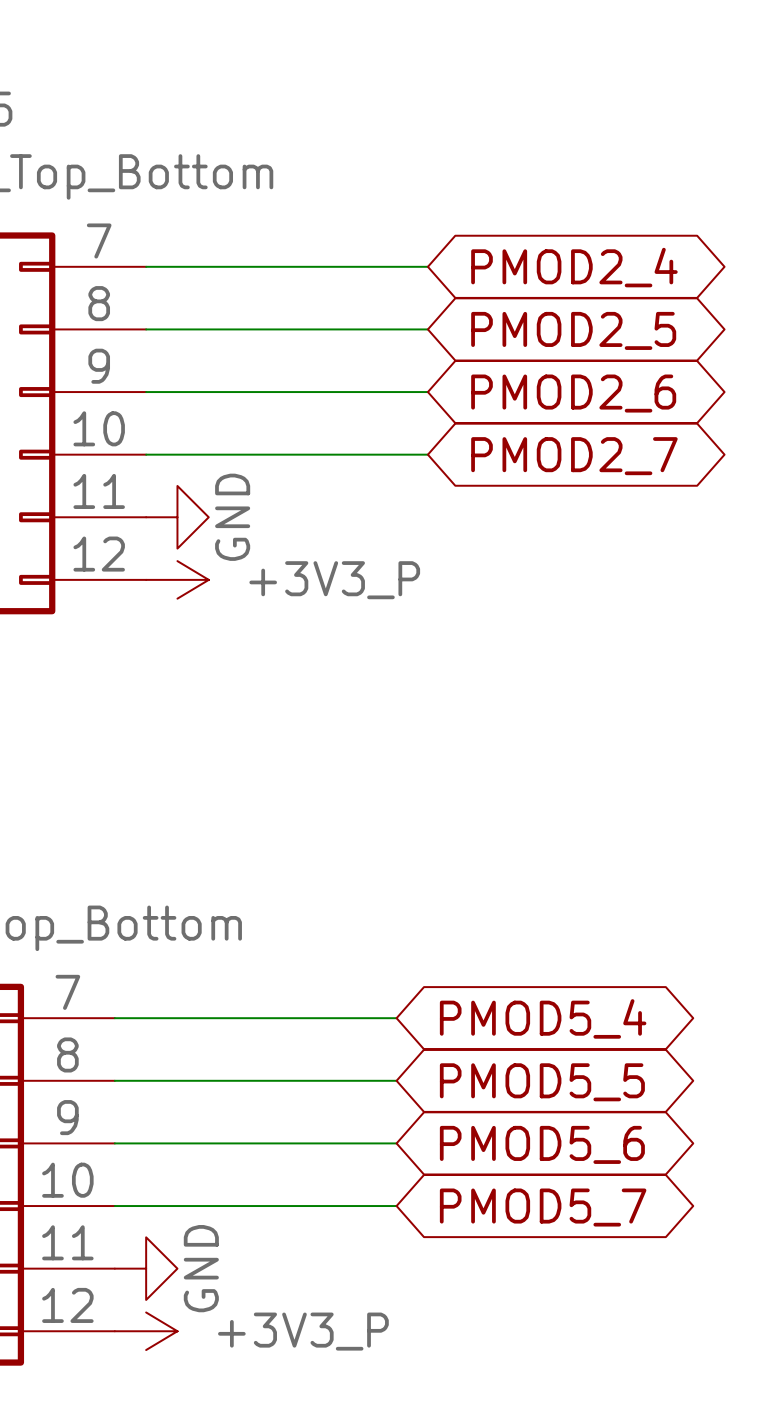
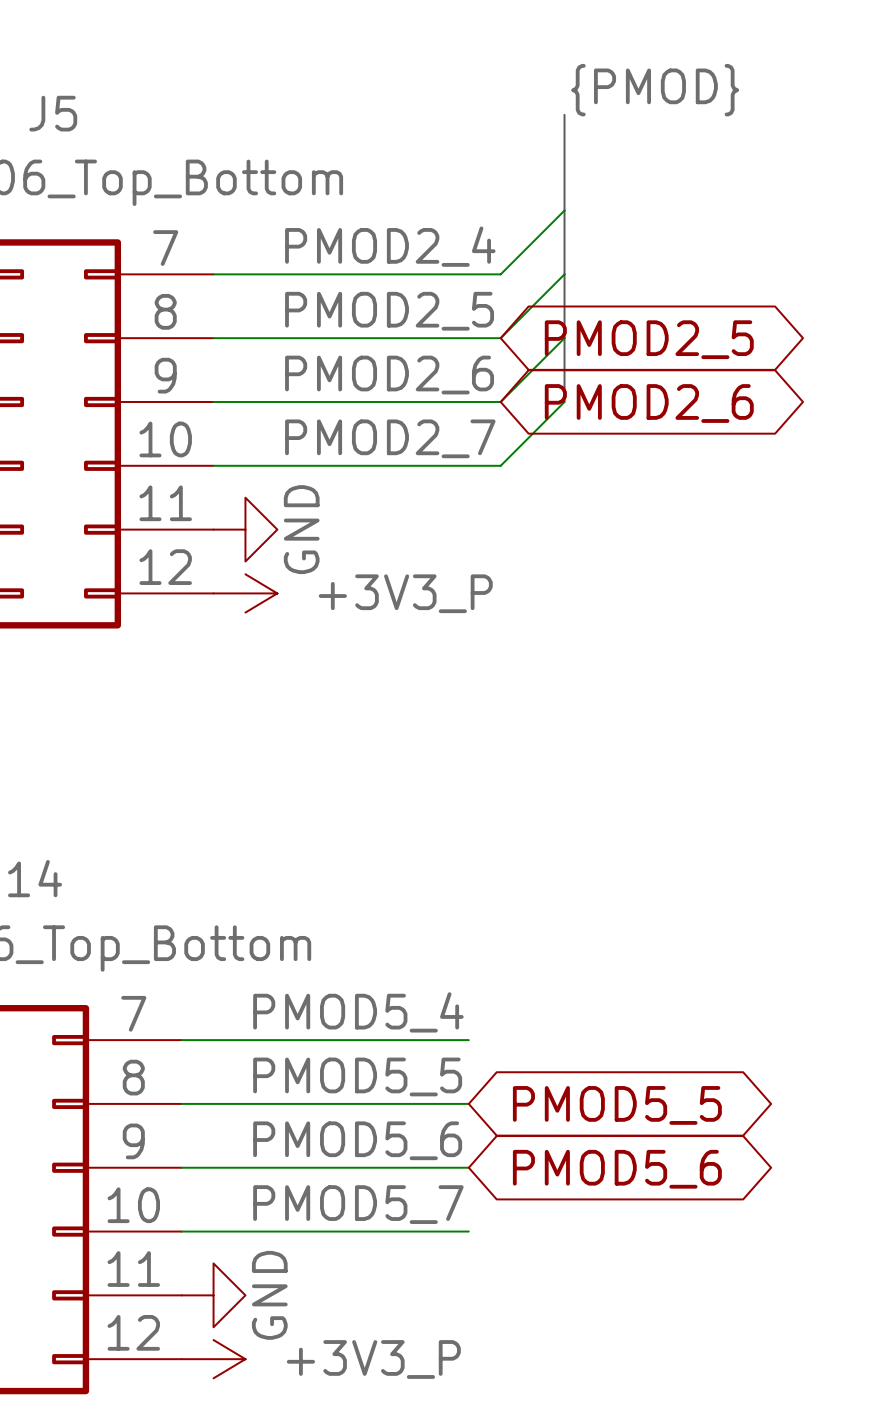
label: none -> {PMOD} (655, 90)
bus: none -> (564, 114) (564, 401)
wire: none -> (564, 210) (500, 274)
label: none -> PMOD2_4 (390, 246)
wire: none -> (564, 274) (500, 338)
global label: PMOD2_4 (574, 267) -> none
label: none -> PMOD2_5 (389, 311)
wire: none -> (564, 338) (500, 401)
label: none -> PMOD2_6 (389, 375)
wire: none -> (564, 401) (500, 465)
label: none -> PMOD2_7 (390, 438)
global label: PMOD2_7 (574, 456) -> none
label: none -> PMOD5_4 (358, 1012)
global label: PMOD5_4 (543, 1018) -> none
label: none -> PMOD5_5 (357, 1076)
label: none -> PMOD5_6 (357, 1140)
label: none -> PMOD5_7 (358, 1204)
global label: PMOD5_7 (543, 1207) -> none

